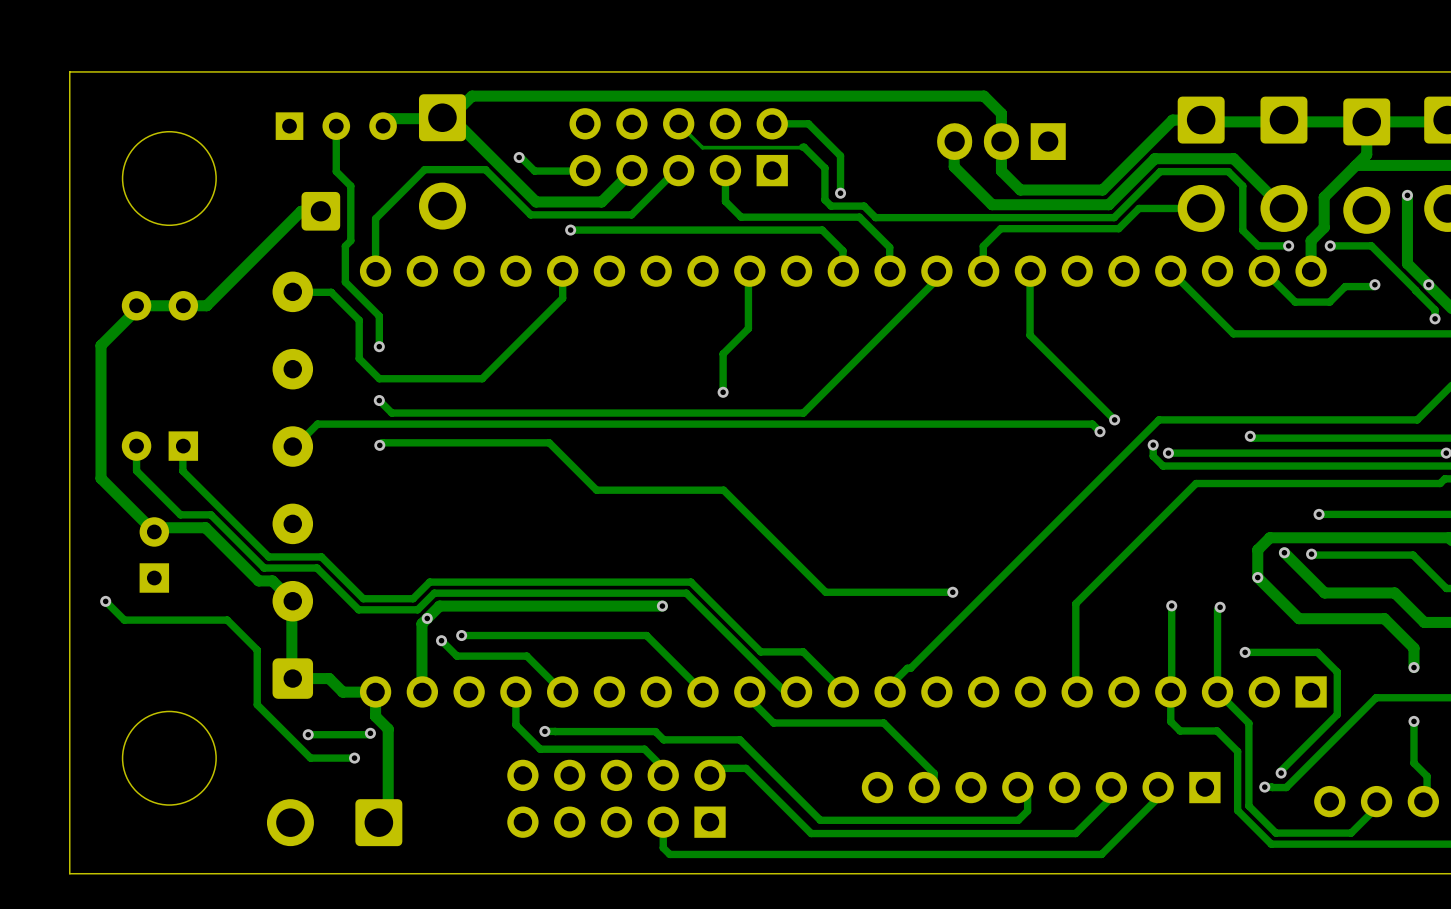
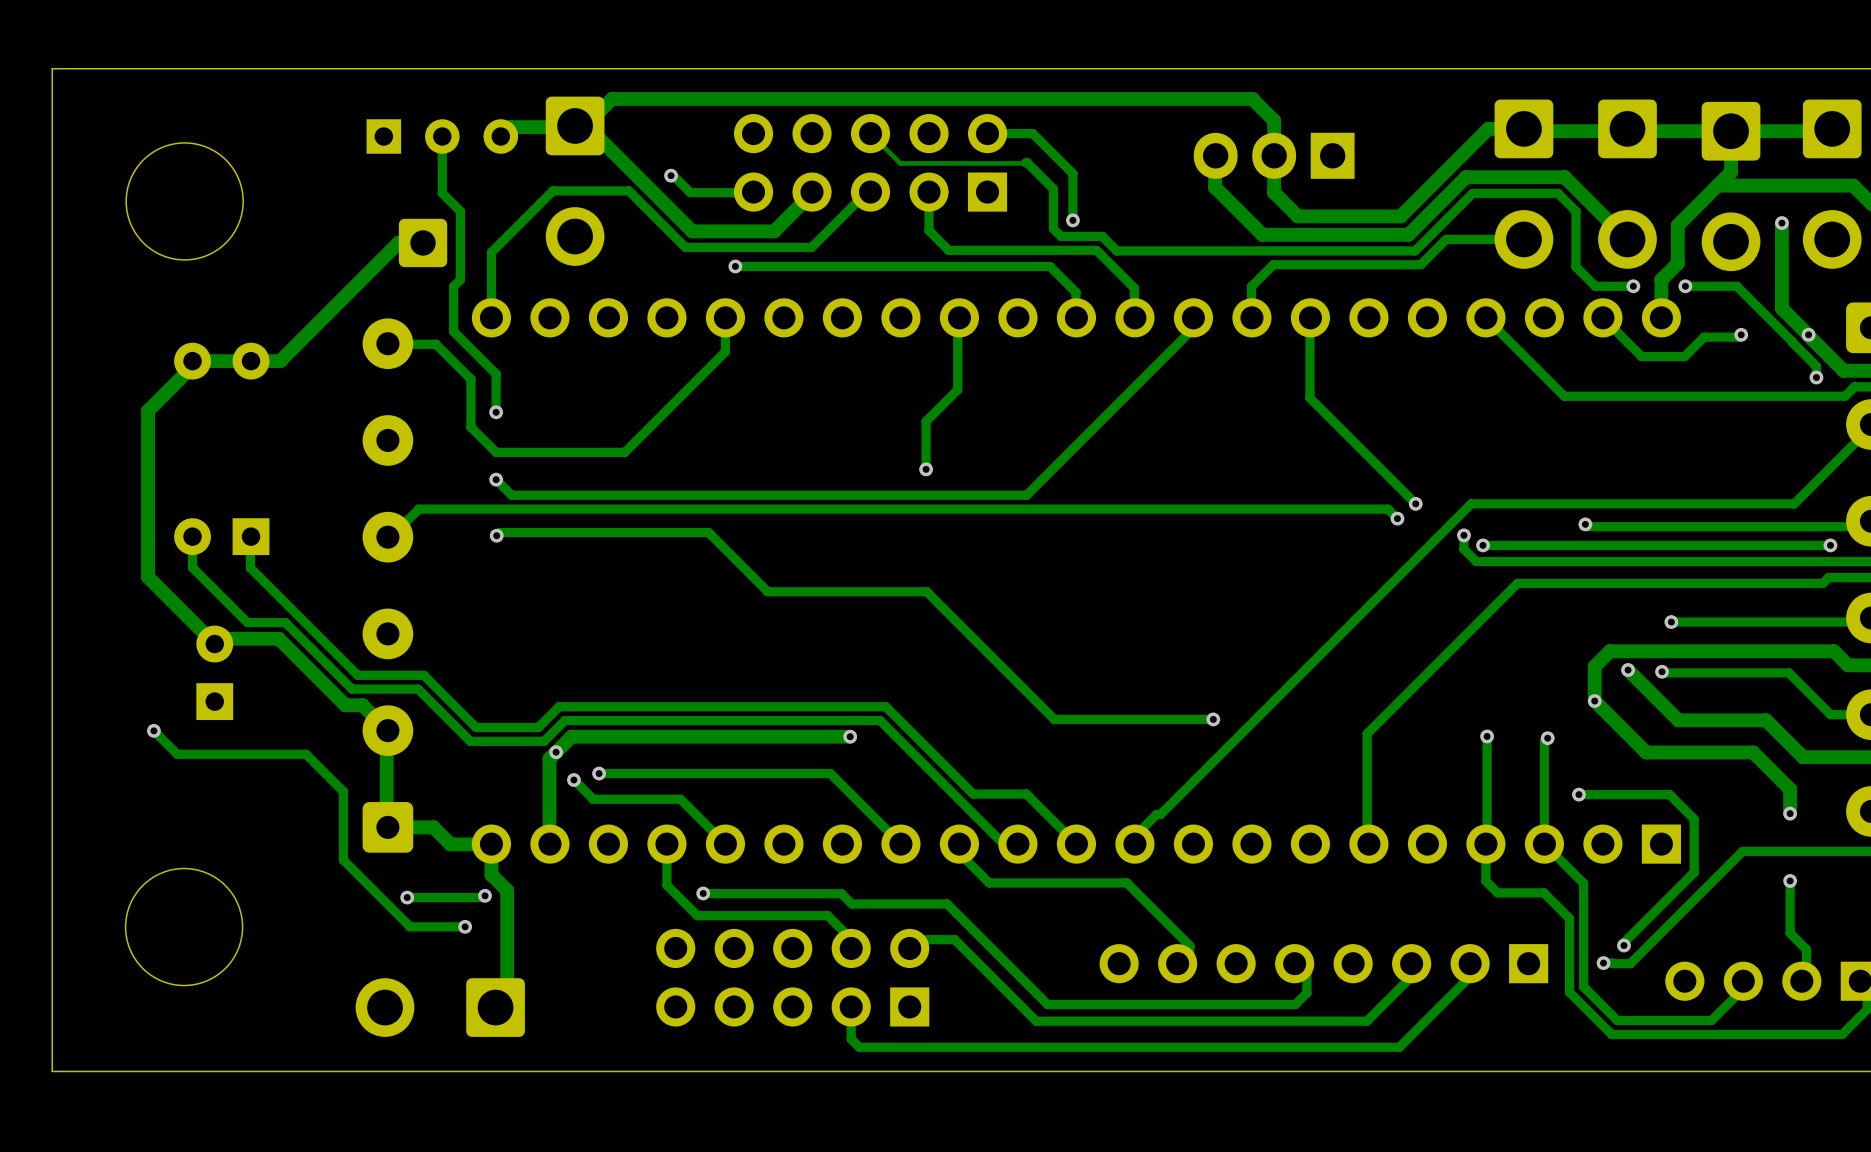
board edge: (69, 71) (69, 873) -> (108, 68) (52, 68) (52, 1071) (108, 1071)
round board edge position: (169, 178) -> (184, 201)
round board edge position: (169, 758) -> (184, 927)

